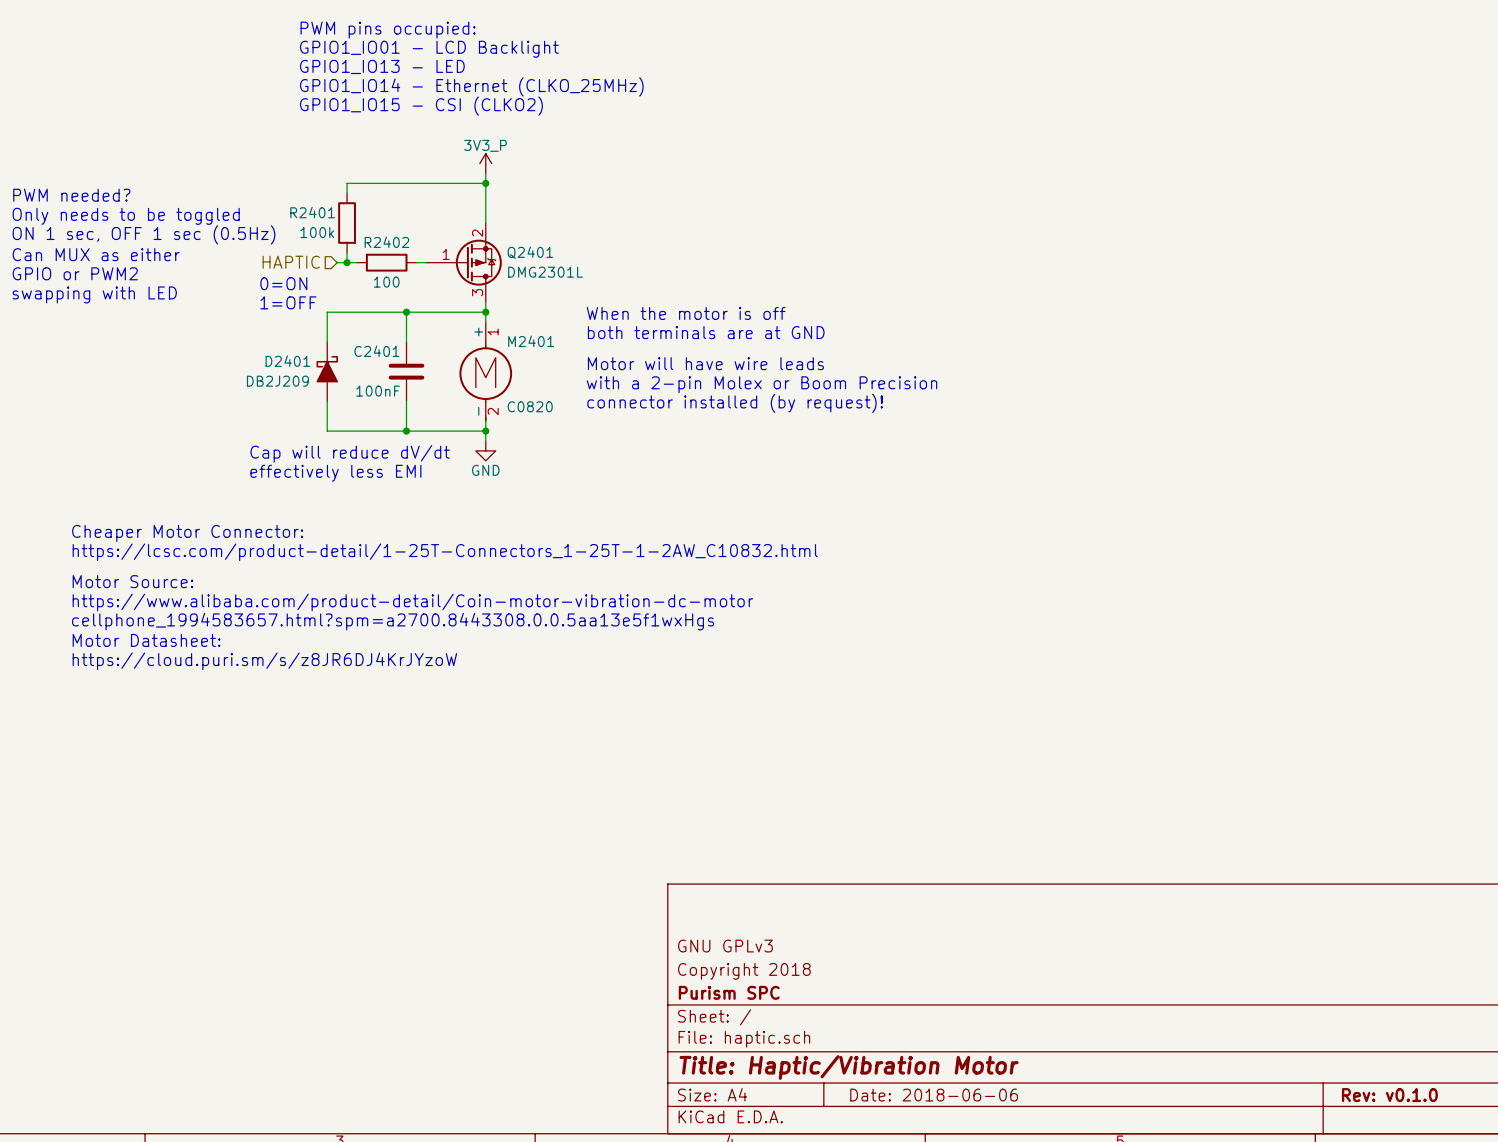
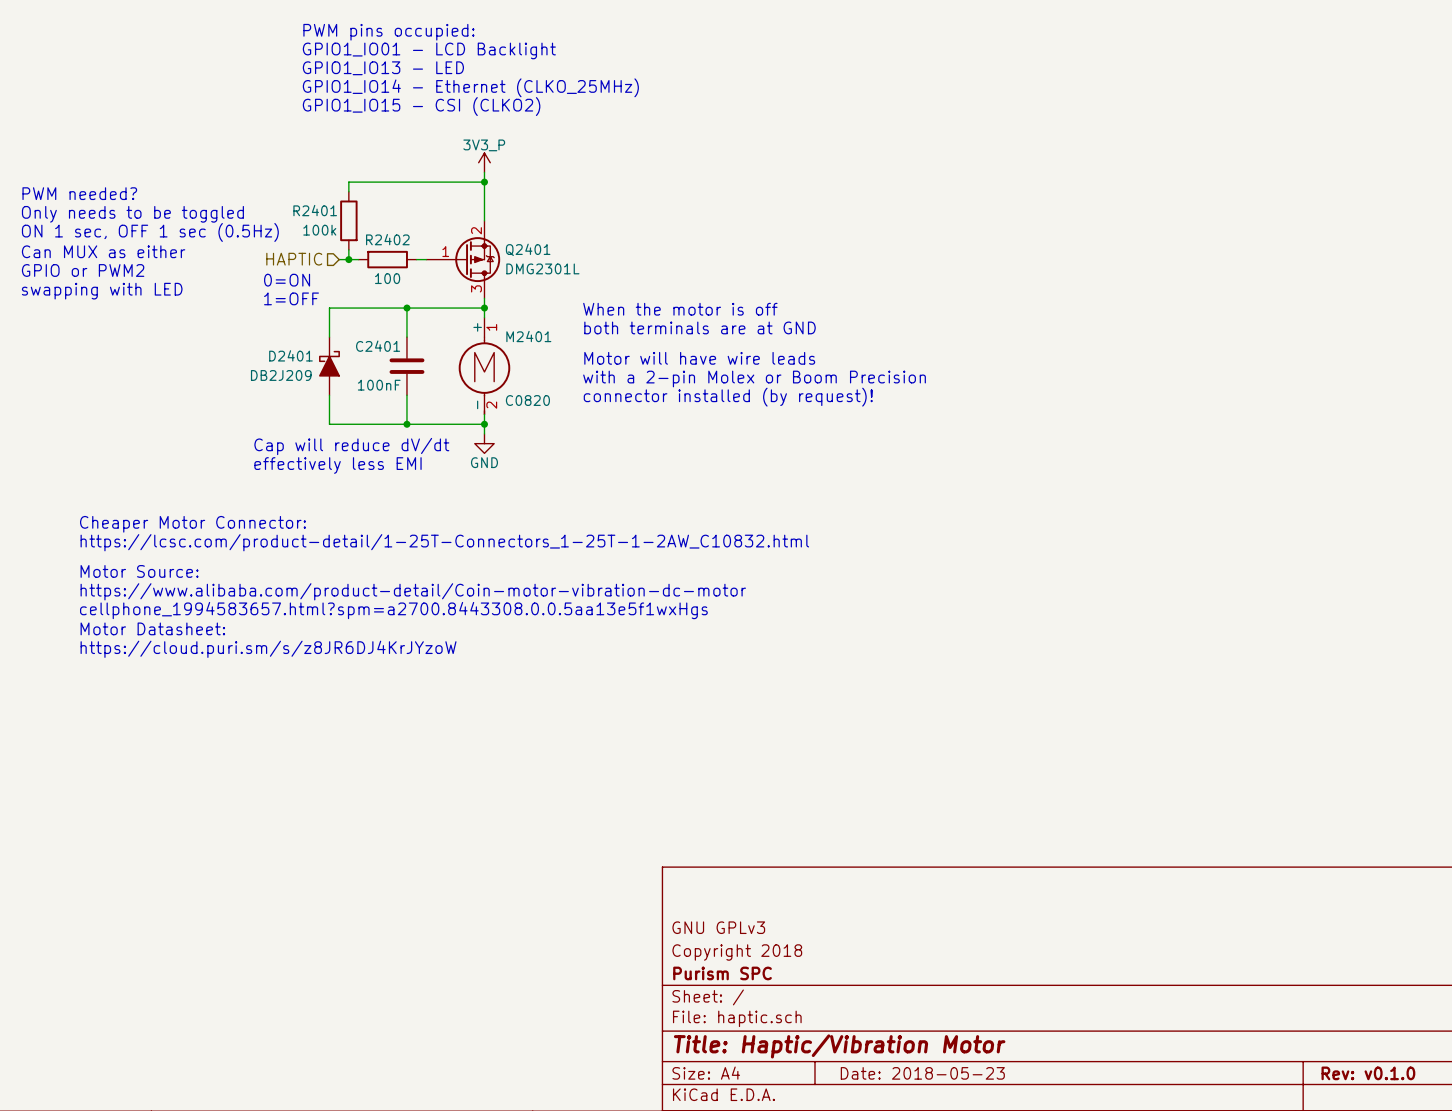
title block: Date: 2018-06-06 (934, 1095) -> Date: 2018-05-23 (922, 1073)

